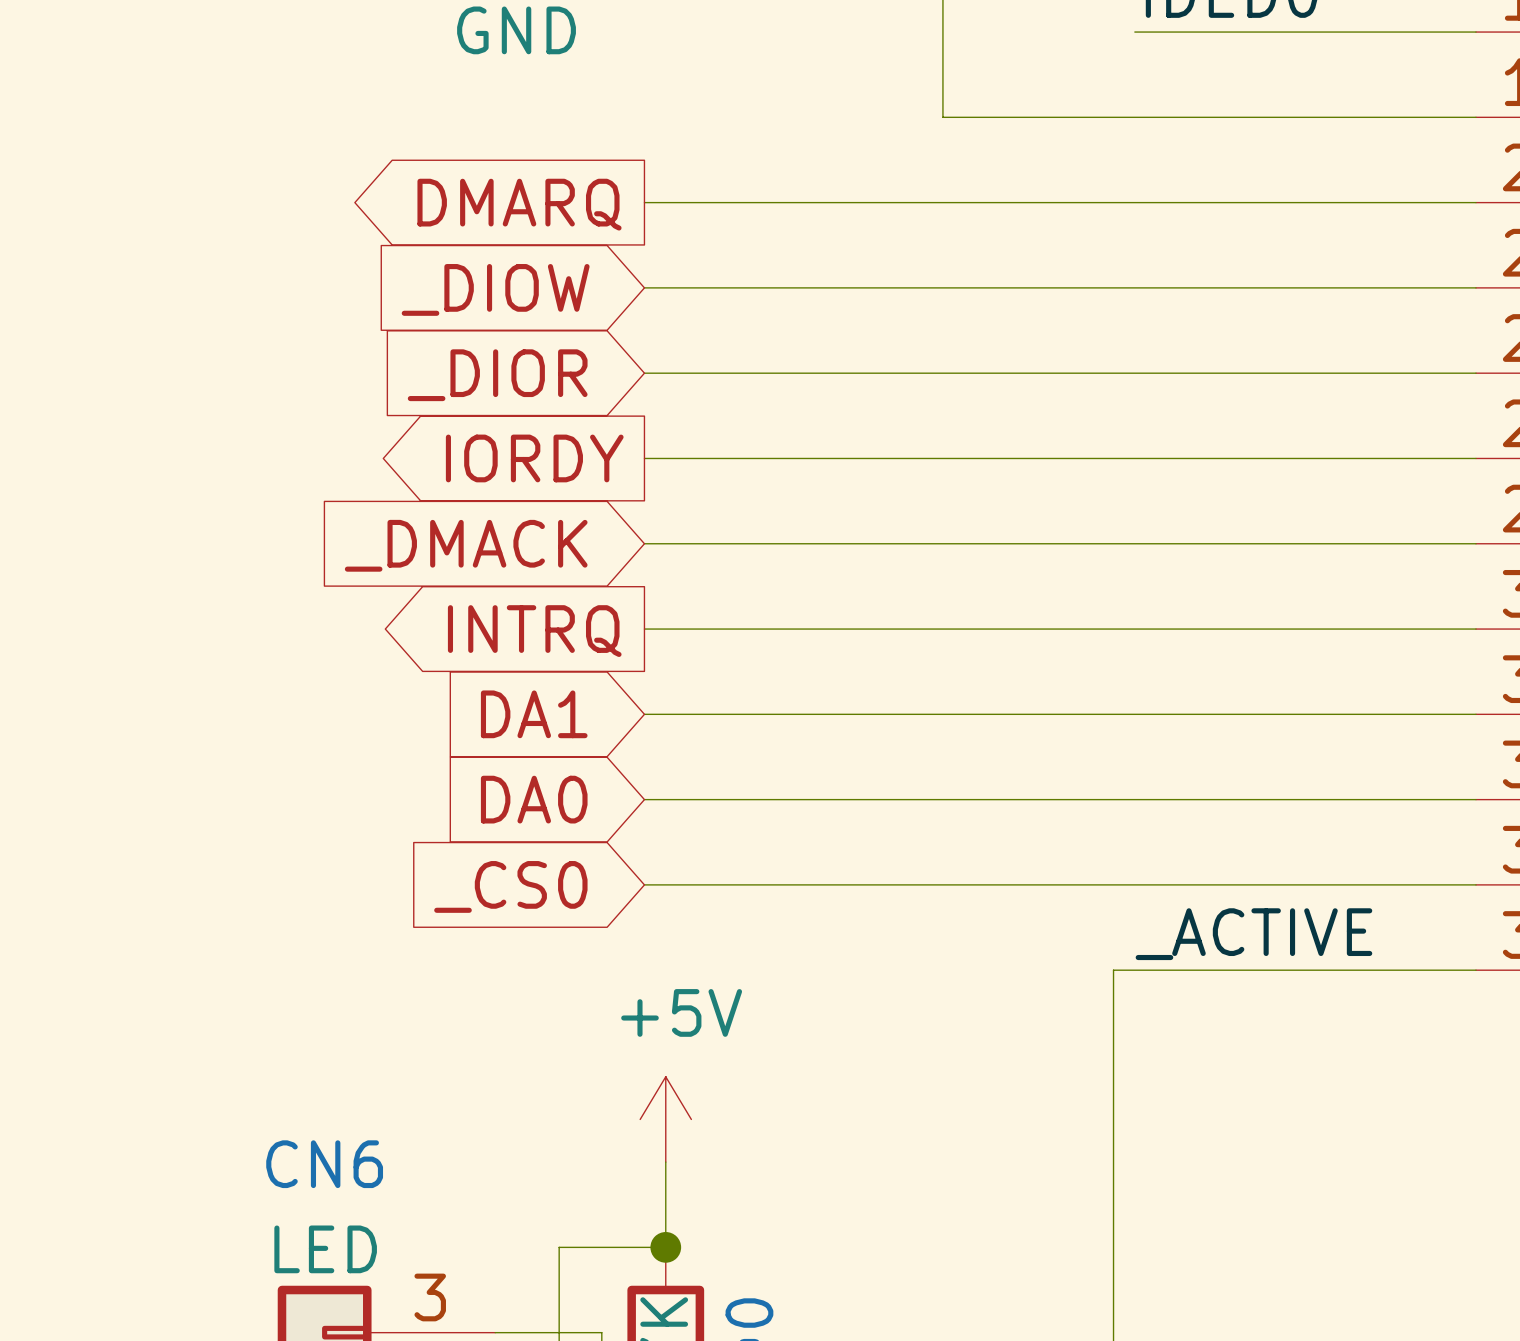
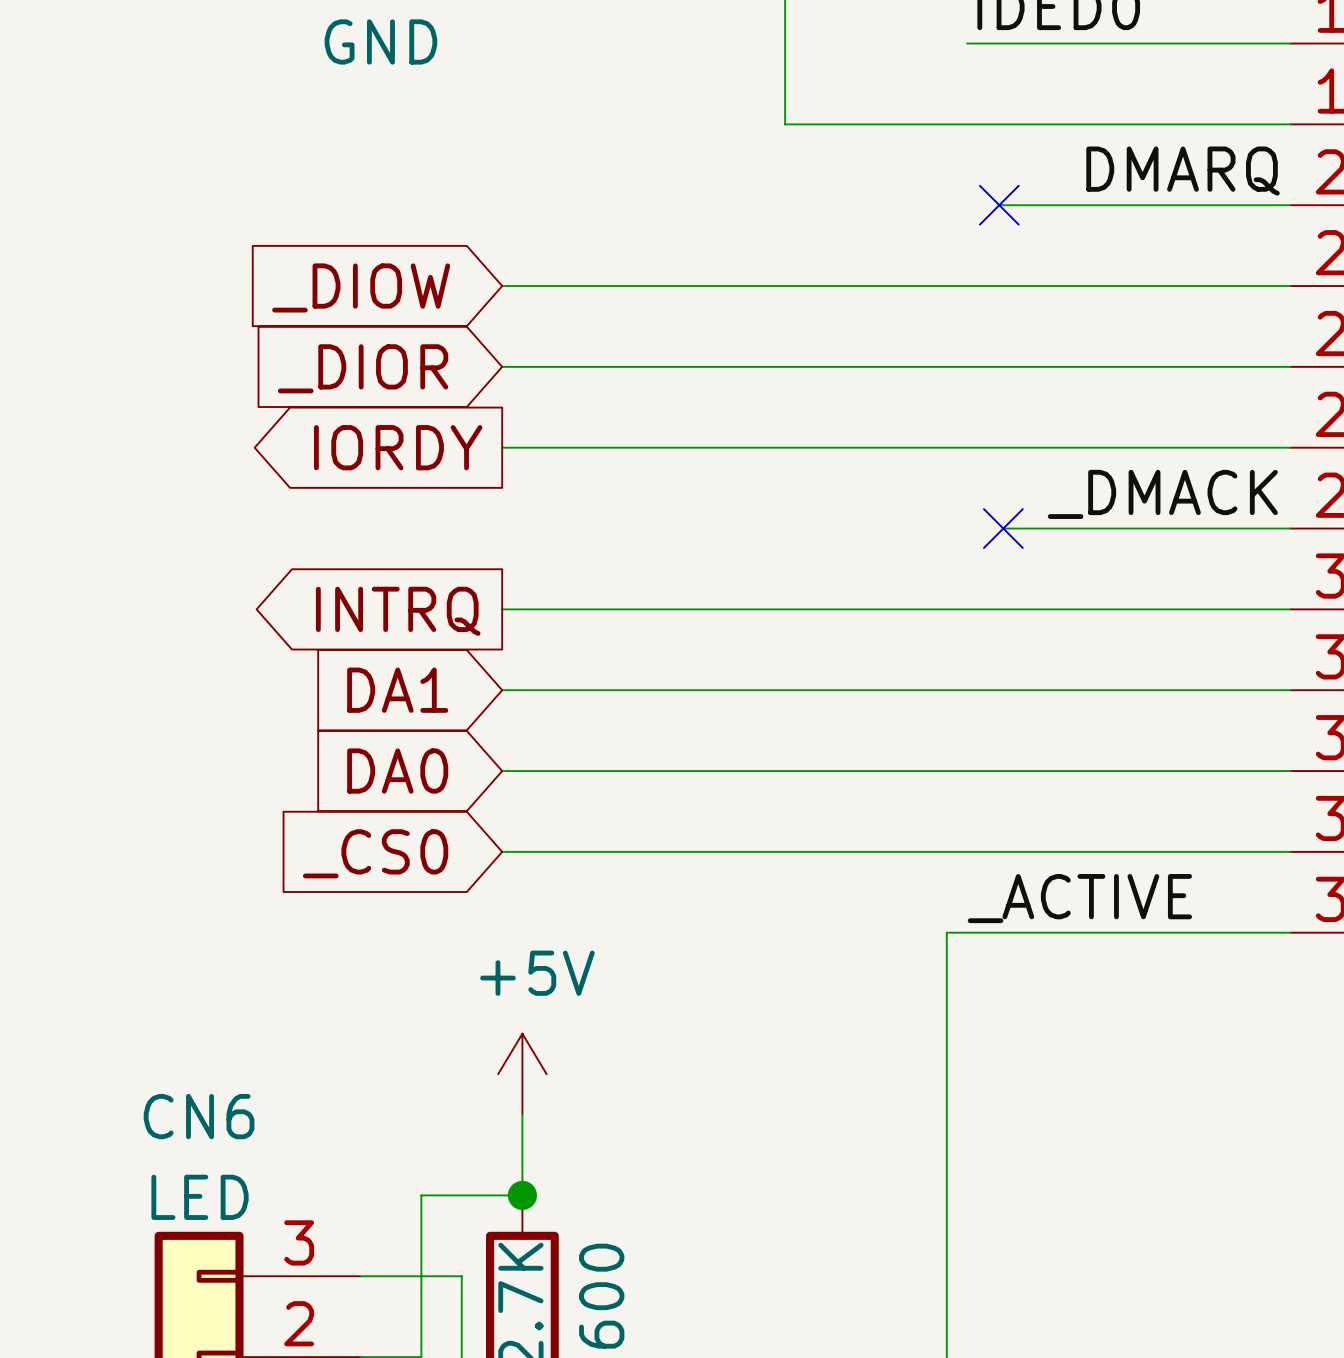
label: none -> DMARQ (1183, 171)
wire: (644, 202) (1168, 202) -> none
no-connect mark: none -> (999, 205)
global label: DMARQ (519, 204) -> none
label: none -> _DMACK (1162, 494)
wire: (644, 543) (1173, 543) -> none
no-connect mark: none -> (1003, 528)
global label: _DMACK (466, 545) -> none

